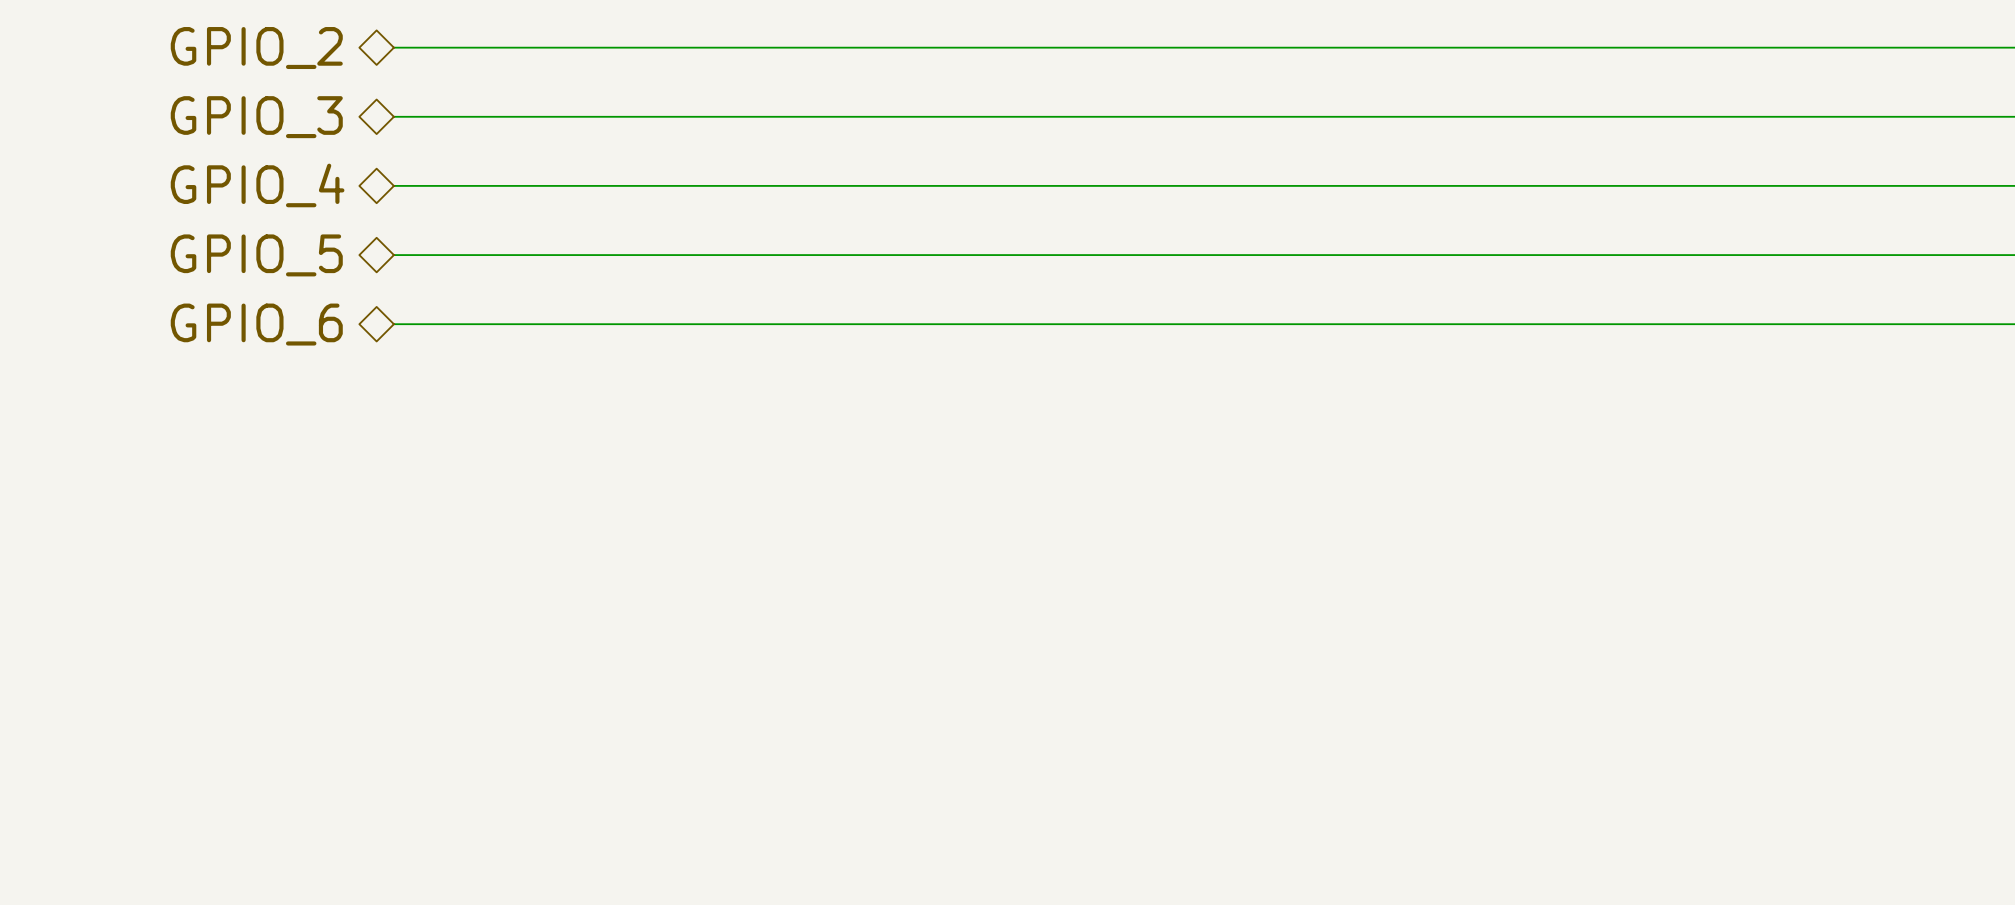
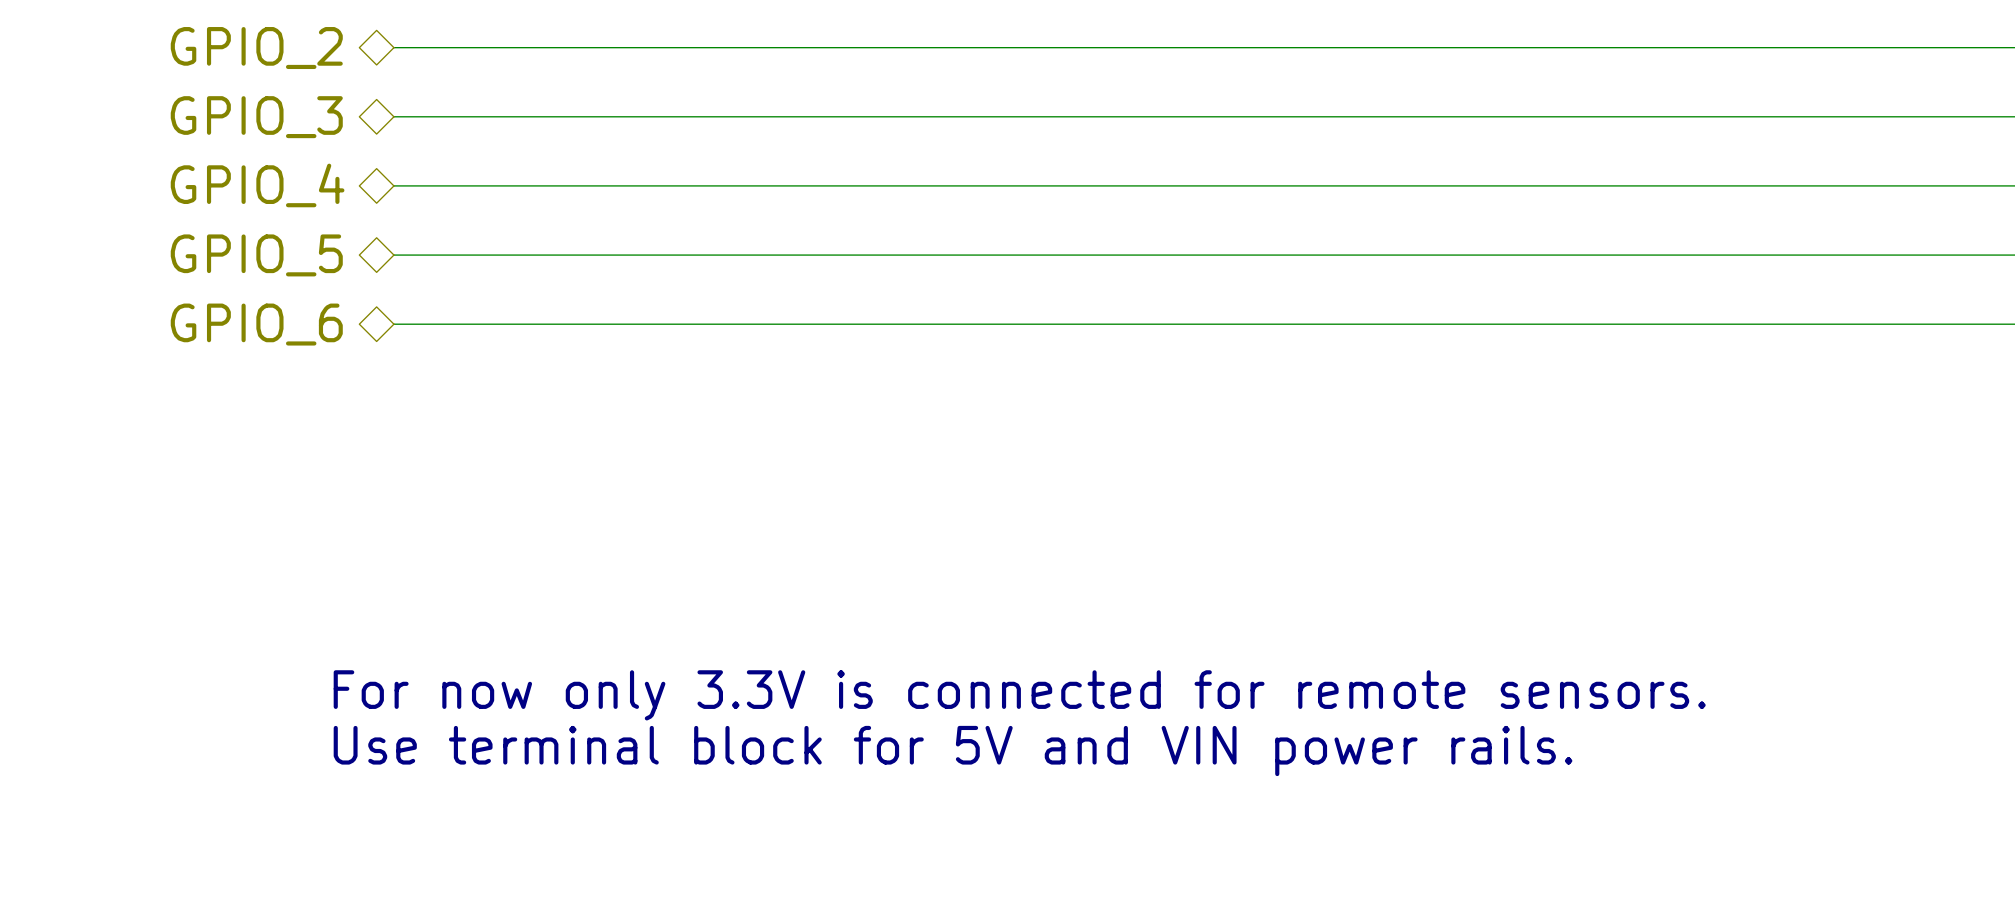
text: none -> For now only 3.3V is connected for remote sensors. (1019, 695)
text: none -> Use terminal block for 5V and VIN power rails. (953, 751)

